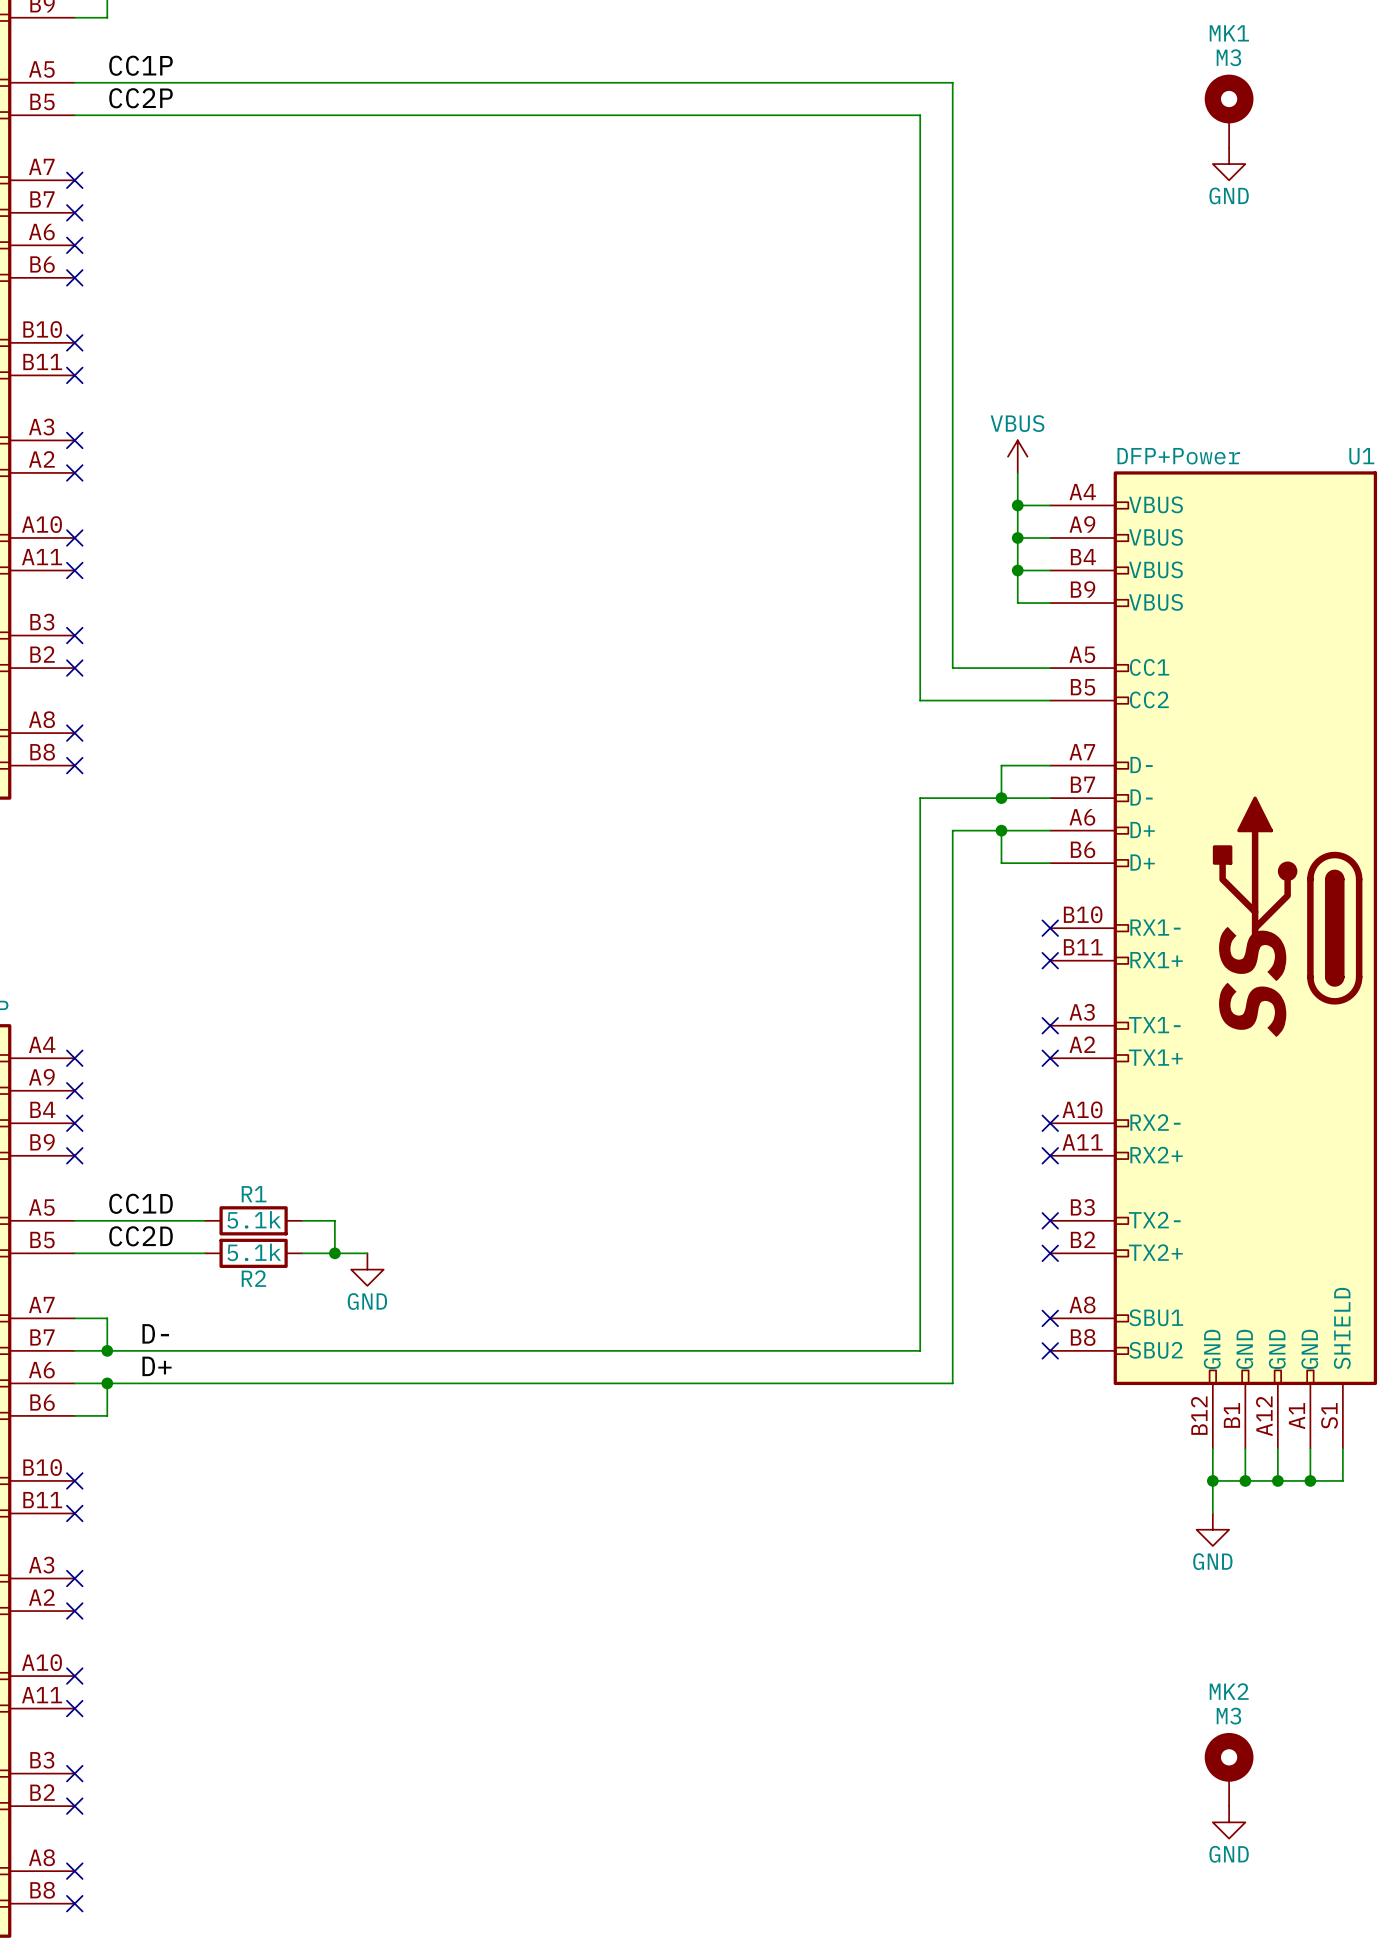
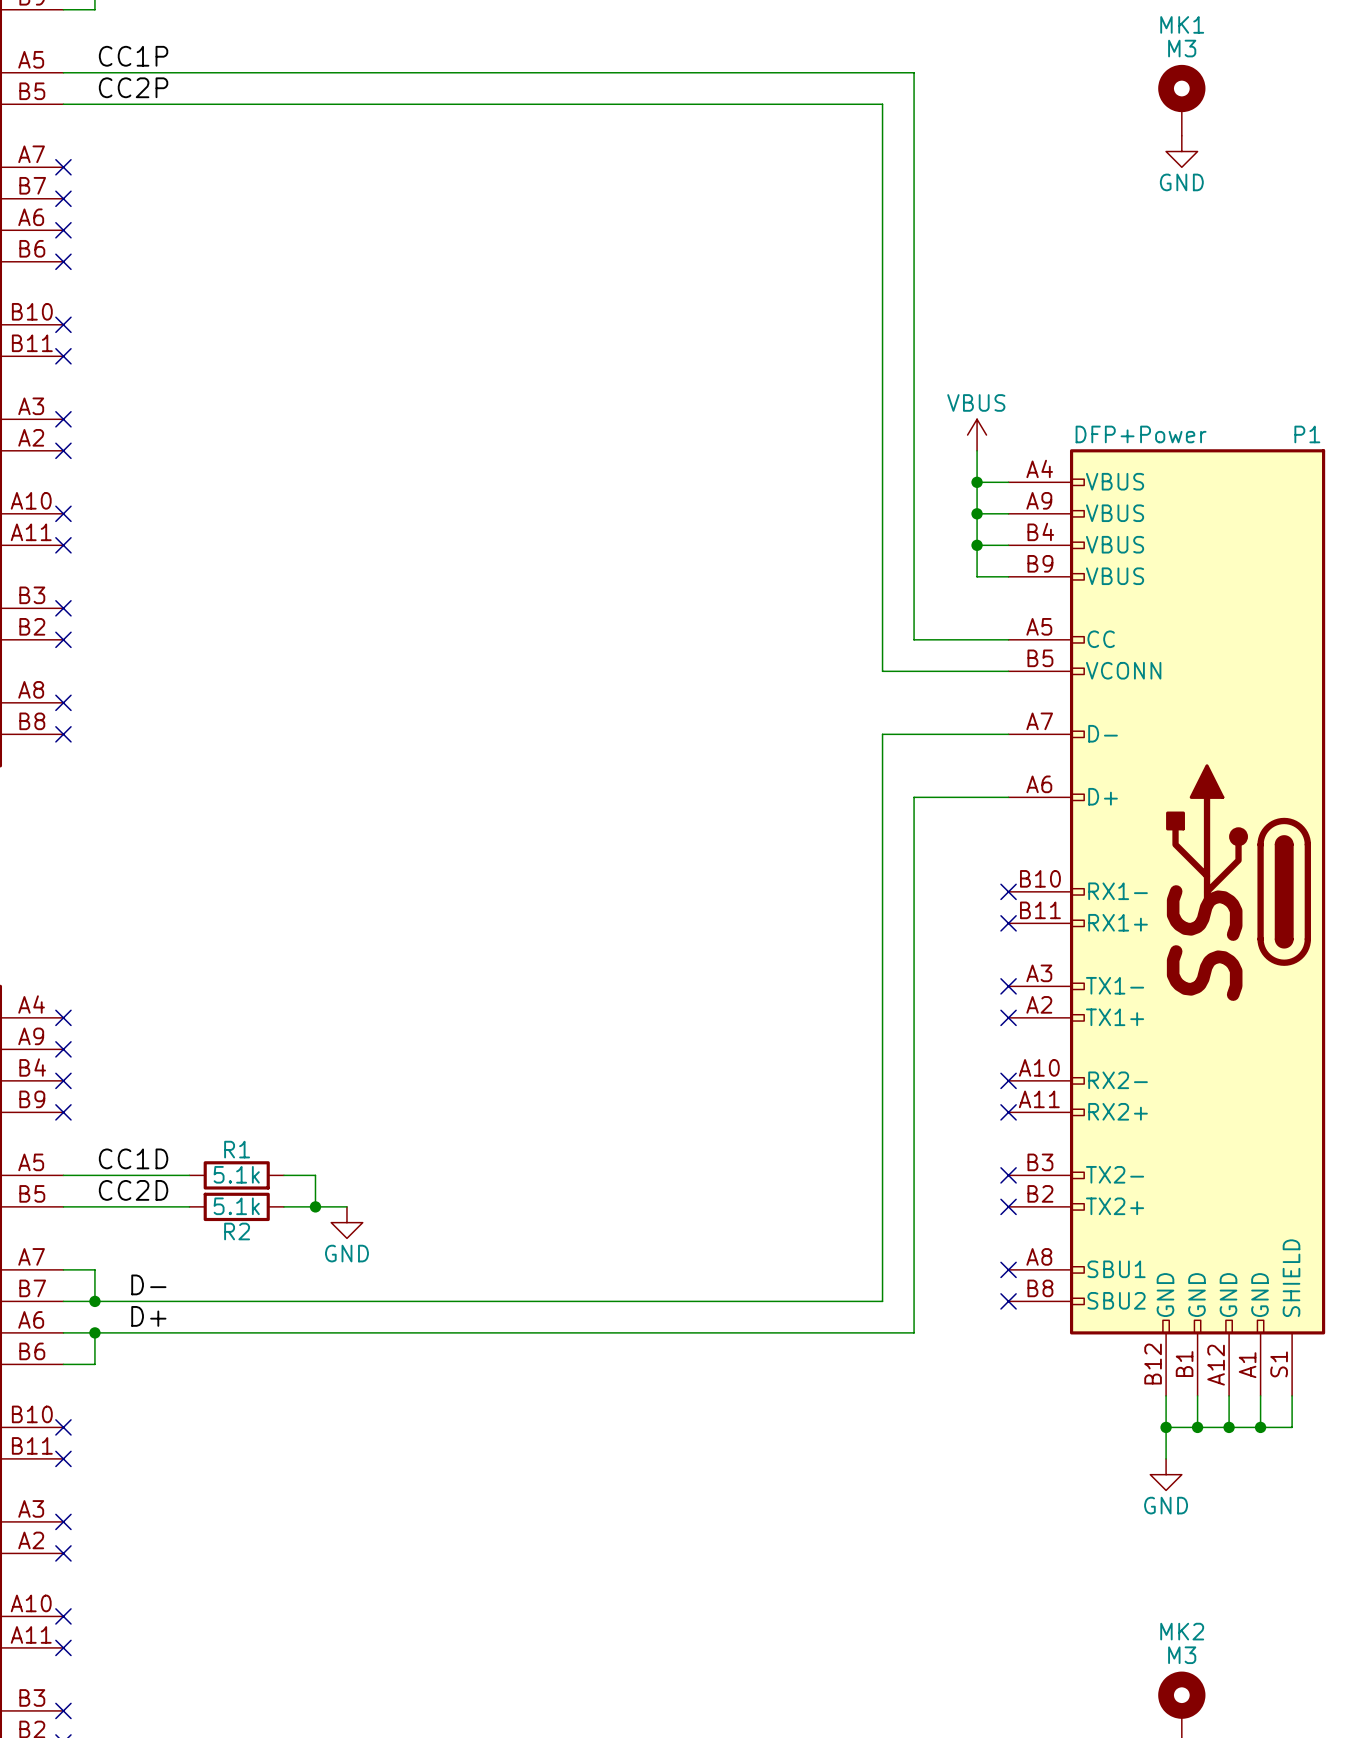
wire: (1001, 765) (1001, 798) -> none
wire: (920, 798) (1050, 798) -> (882, 765) (882, 734) (961, 734)
junction: (1001, 798) -> none
wire: (1001, 830) (1001, 863) (1050, 863) -> none
junction: (1001, 830) -> none
U1: DFP+Power (1213, 959) -> none
P1: none -> DFP+Power (1166, 922)

